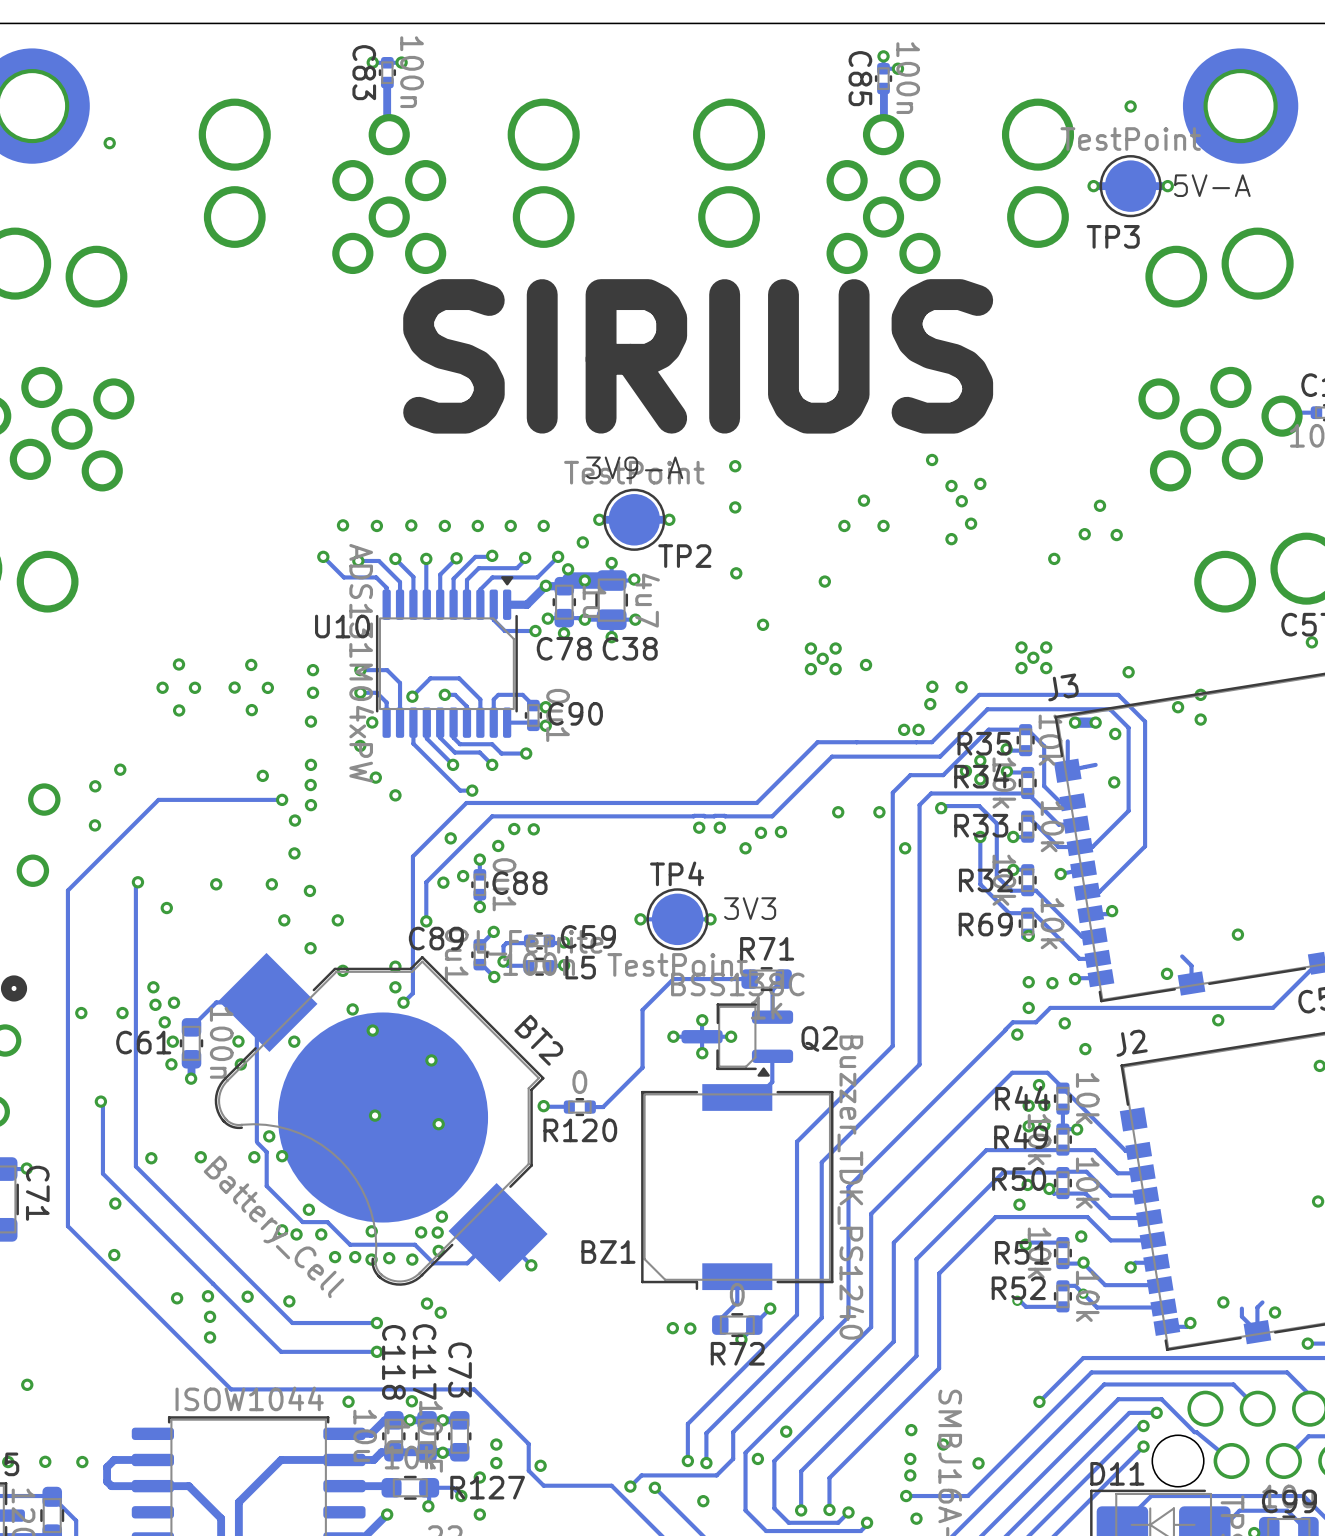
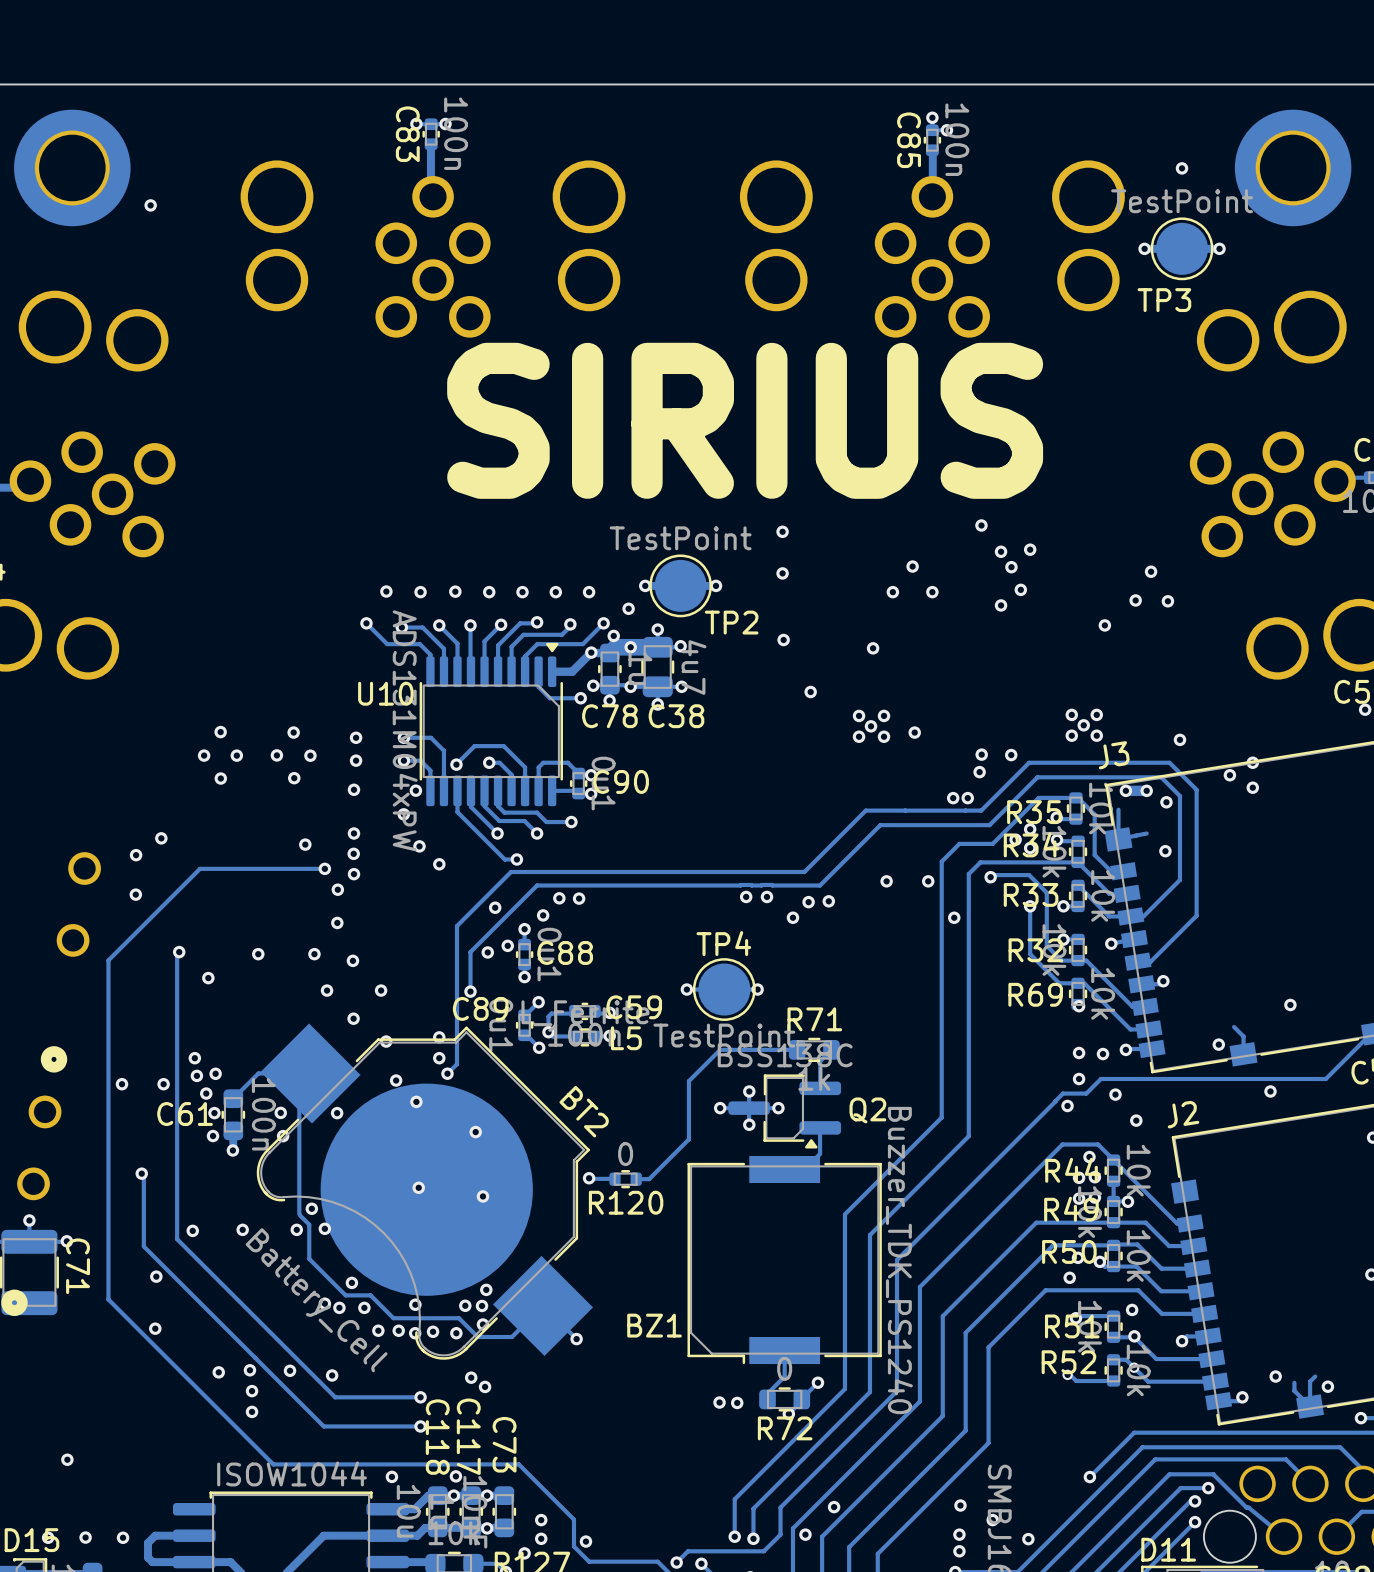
text: 5V-A (1212, 185) -> none
text: 3V9-A (634, 467) -> none
text: 3V3 (750, 908) -> none

